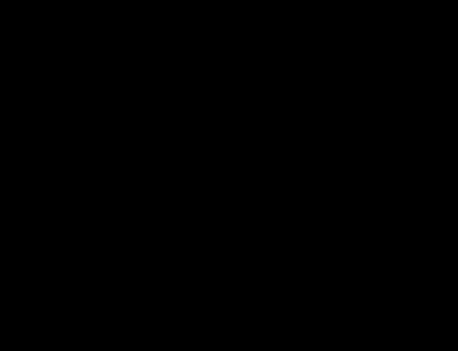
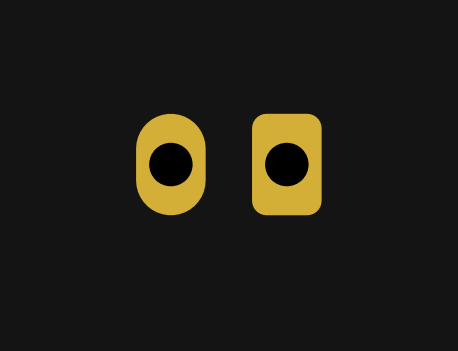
part: none -> (228, 164)

